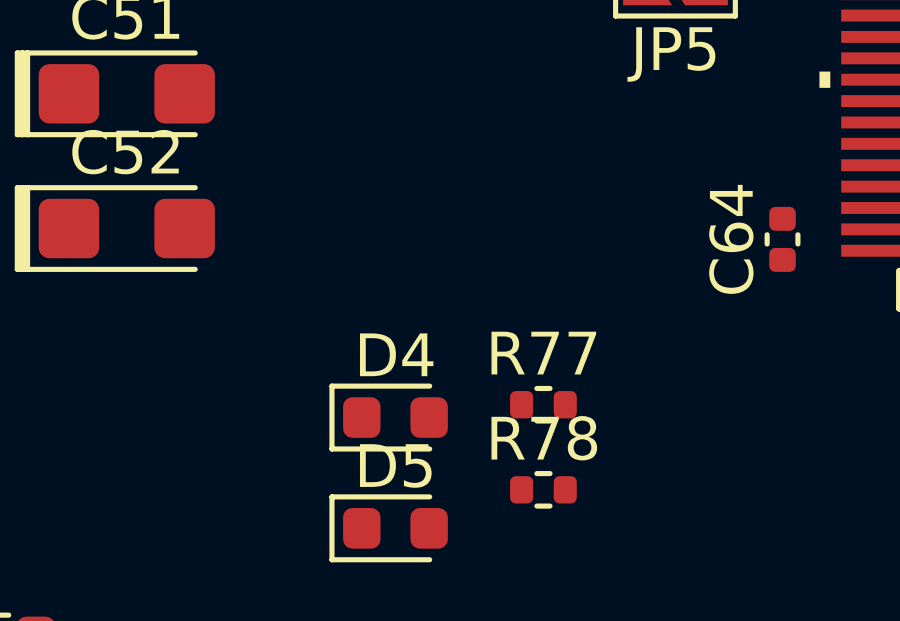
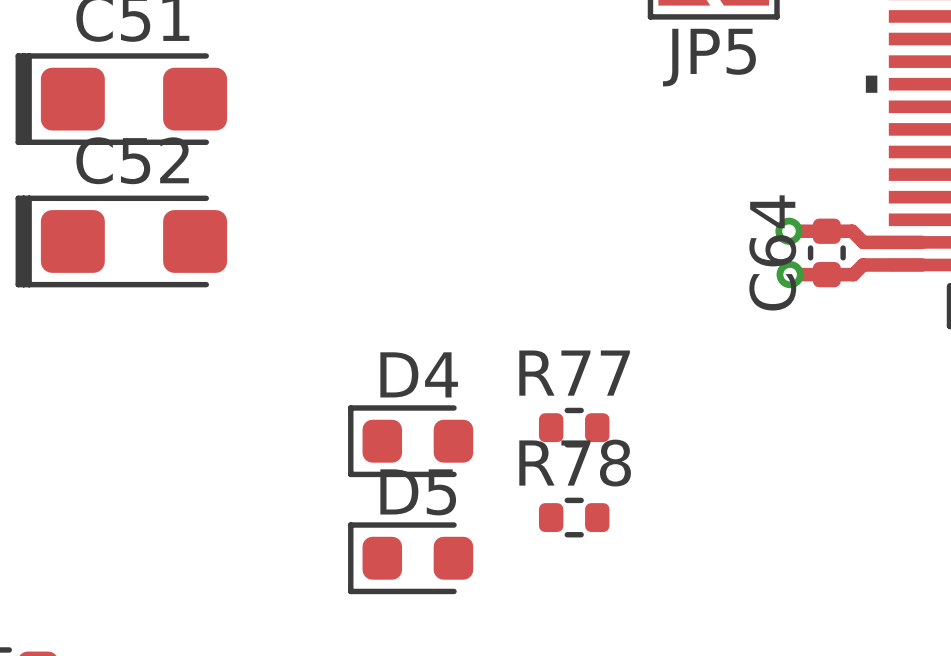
track: none -> (788, 231) (852, 231) (863, 242) (922, 242)
via: none -> (788, 231)
track: none -> (922, 264) (863, 264) (853, 274) (790, 274)
via: none -> (790, 274)

